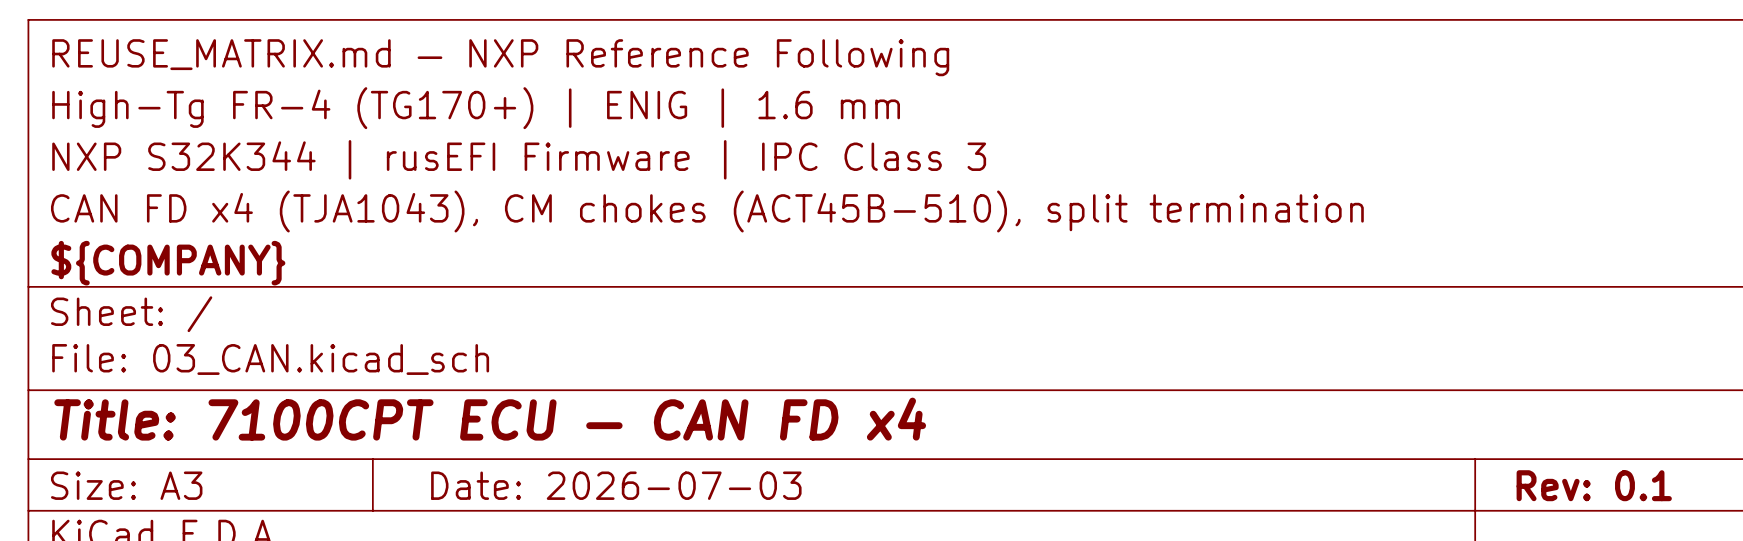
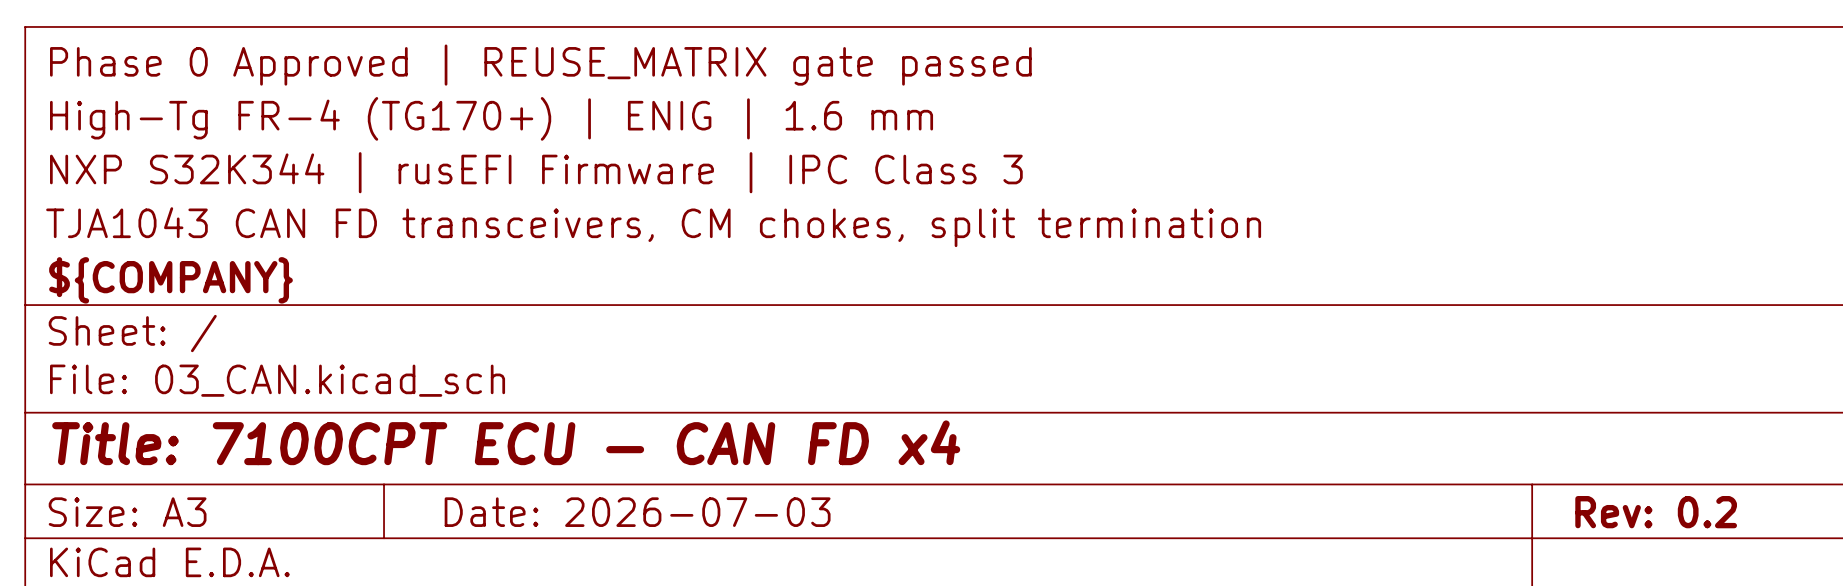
title block: REUSE_MATRIX.md — NXP Reference Following (500, 57) -> Phase 0 Approved | REUSE_MATRIX gate passed (540, 65)
title block: CAN FD x4 (TJA1043), CM chokes (ACT45B-510), split termination (707, 211) -> TJA1043 CAN FD transceivers, CM chokes, split termination (653, 227)
title block: Rev: 0.1 (1594, 485) -> Rev: 0.2 (1656, 512)

